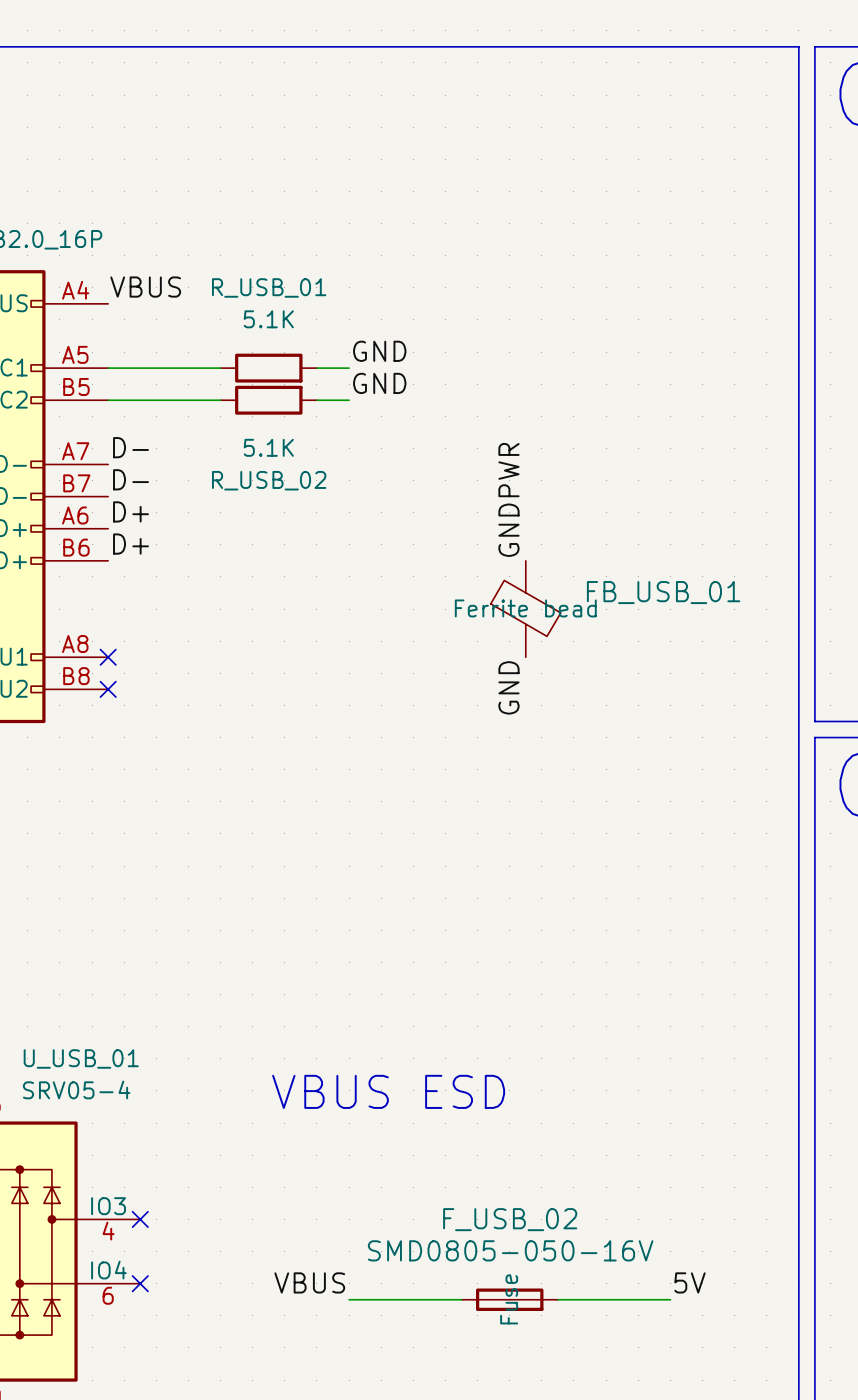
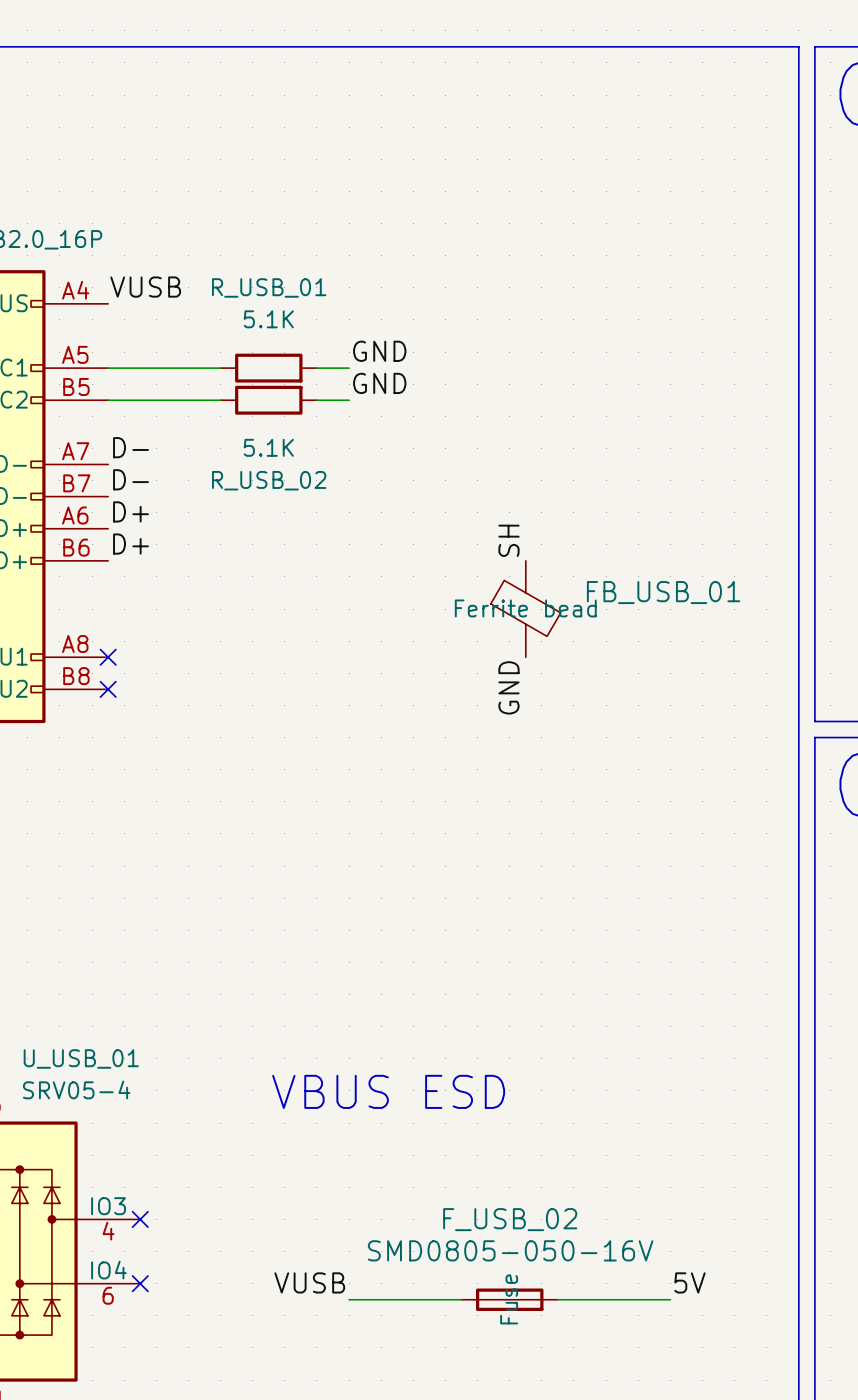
label: VBUS (145, 287) -> VUSB (145, 287)
label: GNDPWR (508, 499) -> SH (508, 540)
label: VBUS (309, 1282) -> VUSB (309, 1282)

